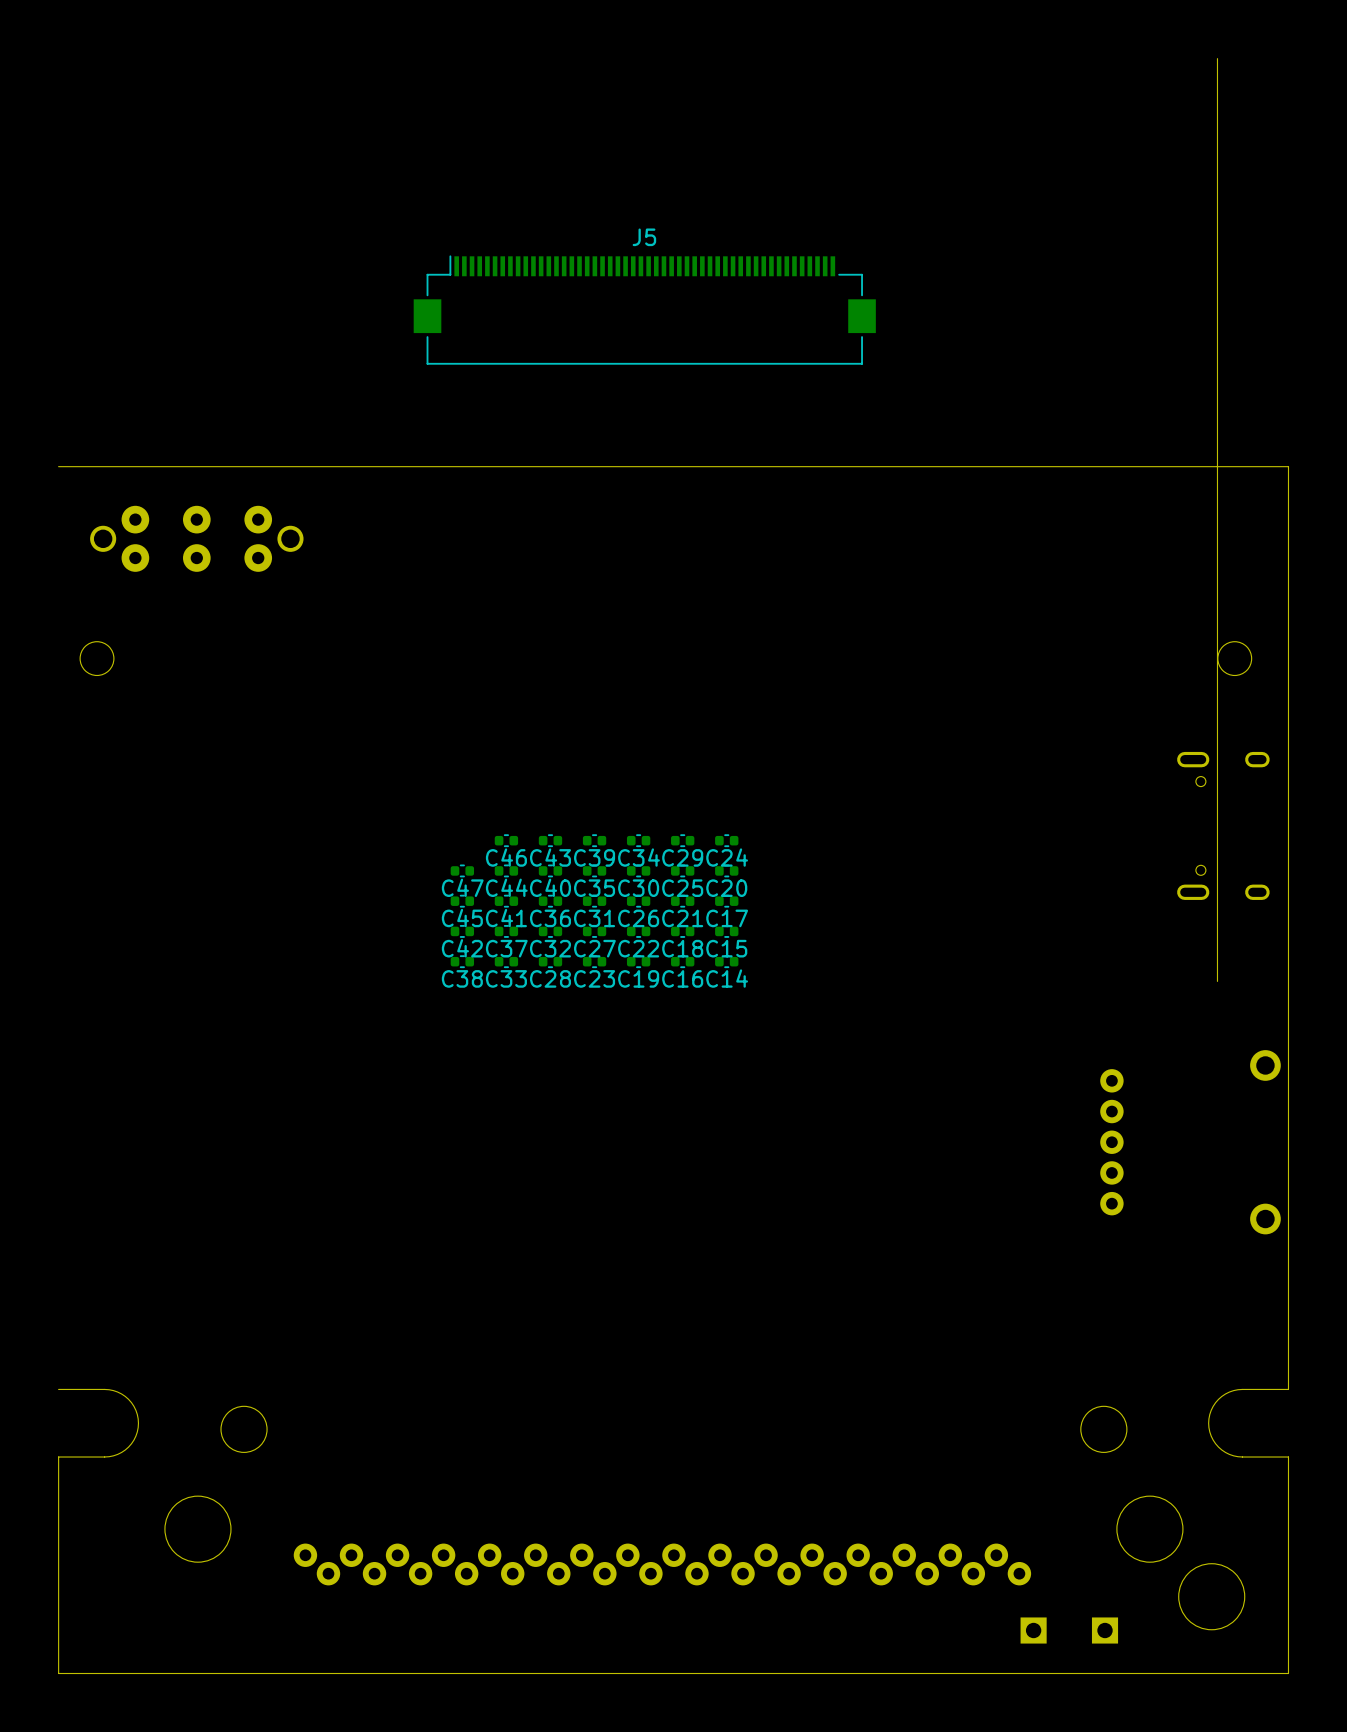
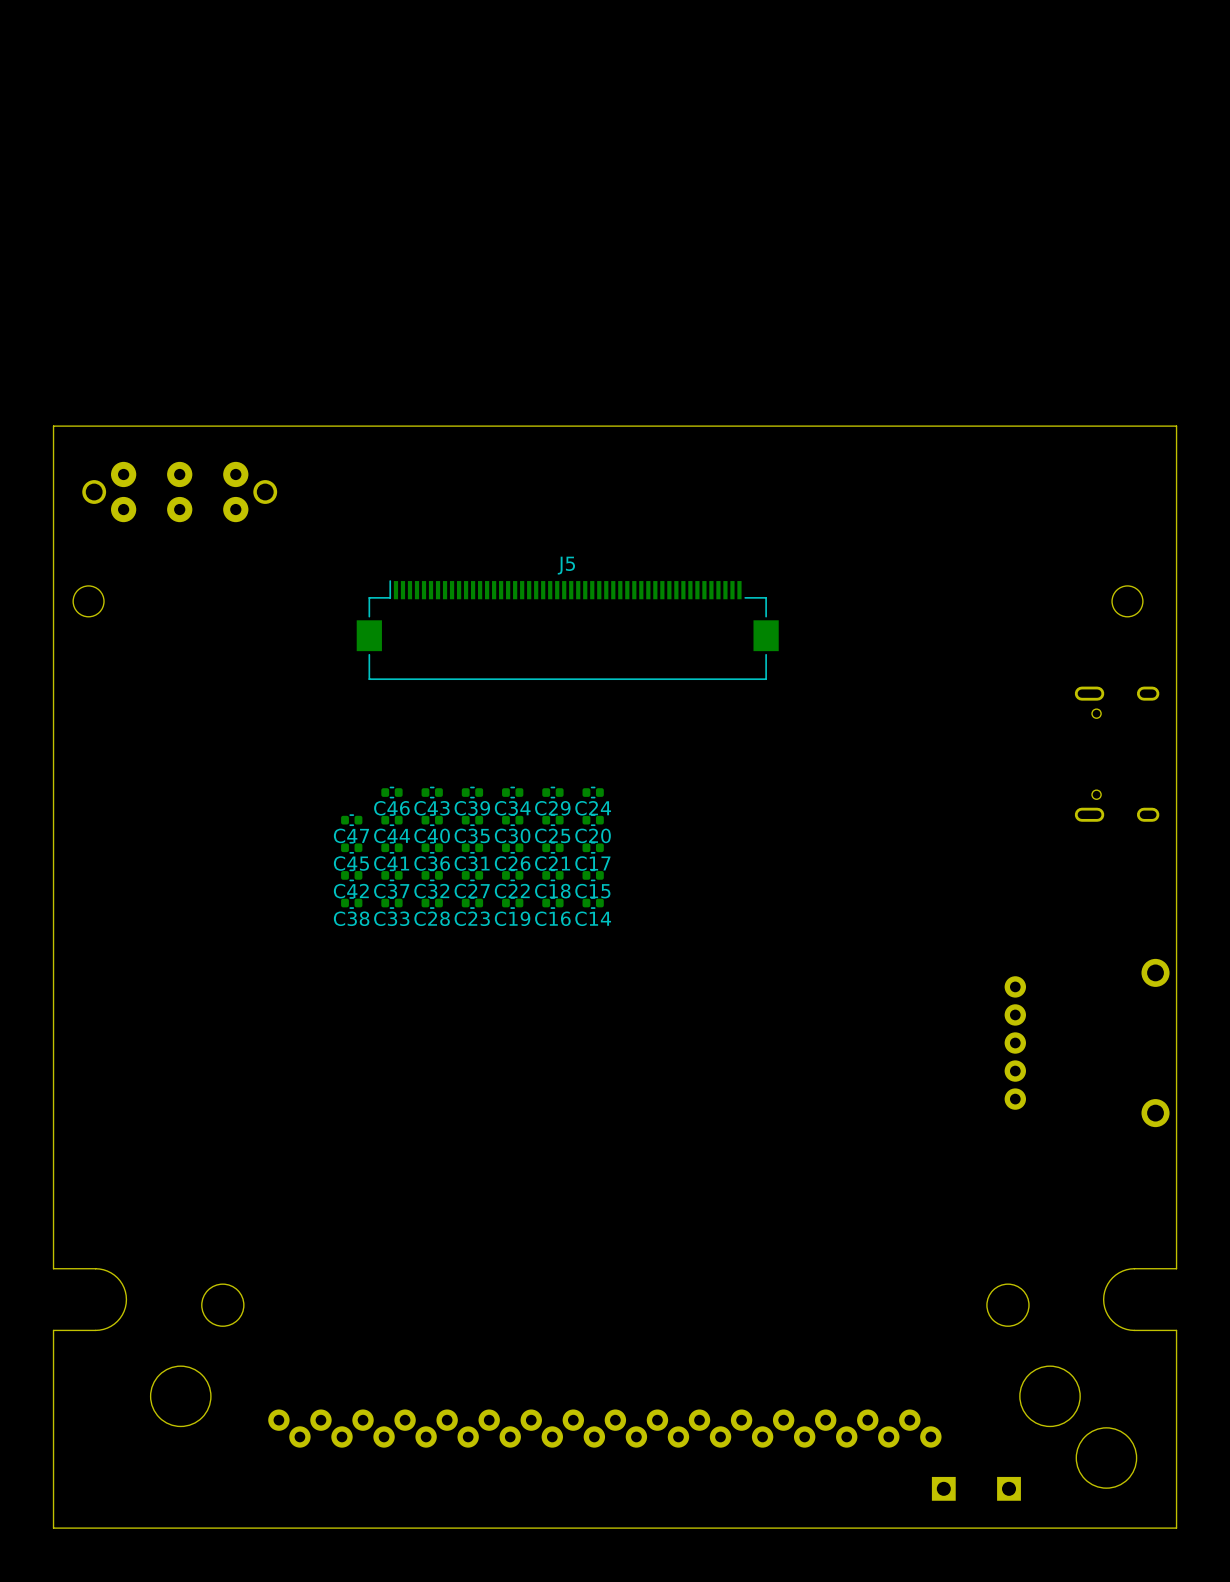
board edge: (1217, 58) (1217, 981) -> none
J5 position: (644, 310) -> (567, 630)
board edge: none -> (53, 426) (53, 1268)
C46 position: (506, 840) -> (391, 792)
C43 position: (550, 840) -> (432, 792)
C39 position: (594, 840) -> (472, 792)
C34 position: (638, 840) -> (512, 792)
C29 position: (682, 840) -> (552, 792)
C24 position: (726, 840) -> (593, 792)
C47 position: (462, 870) -> (351, 820)
C44 position: (506, 870) -> (391, 820)
C40 position: (550, 870) -> (432, 820)
C35 position: (594, 870) -> (472, 820)
C30 position: (638, 870) -> (512, 820)
C25 position: (682, 870) -> (552, 820)
C20 position: (726, 870) -> (593, 820)
C45 position: (462, 901) -> (351, 847)
C41 position: (506, 901) -> (391, 847)
C36 position: (550, 901) -> (432, 847)
C31 position: (594, 901) -> (472, 847)
C26 position: (638, 901) -> (512, 847)
C21 position: (682, 901) -> (552, 847)
C17 position: (726, 901) -> (593, 847)
C42 position: (462, 931) -> (351, 875)
C37 position: (506, 931) -> (391, 875)
C32 position: (550, 931) -> (432, 875)
C27 position: (594, 931) -> (472, 875)
C22 position: (638, 931) -> (512, 875)
C18 position: (682, 931) -> (552, 875)
C15 position: (726, 931) -> (593, 875)
C38 position: (462, 961) -> (351, 903)
C33 position: (506, 961) -> (391, 903)
C28 position: (550, 961) -> (432, 903)
C23 position: (594, 961) -> (472, 903)
C19 position: (638, 961) -> (512, 903)
C16 position: (682, 961) -> (552, 903)
C14 position: (726, 961) -> (593, 903)

